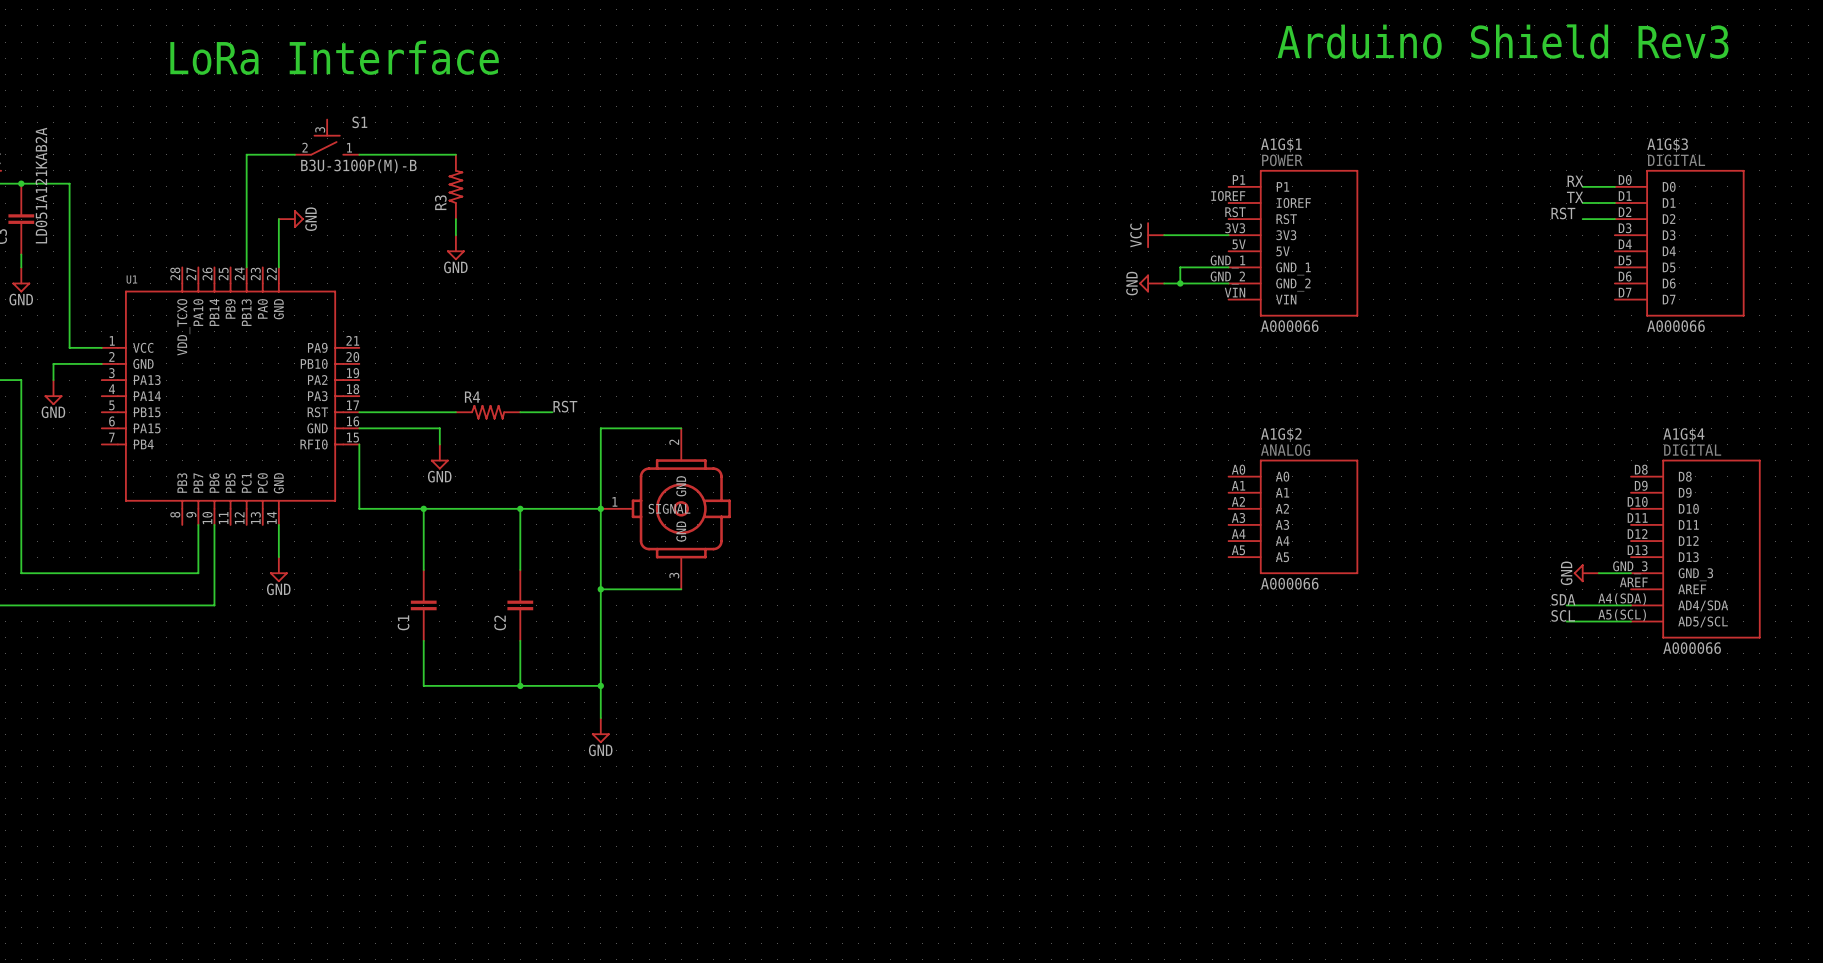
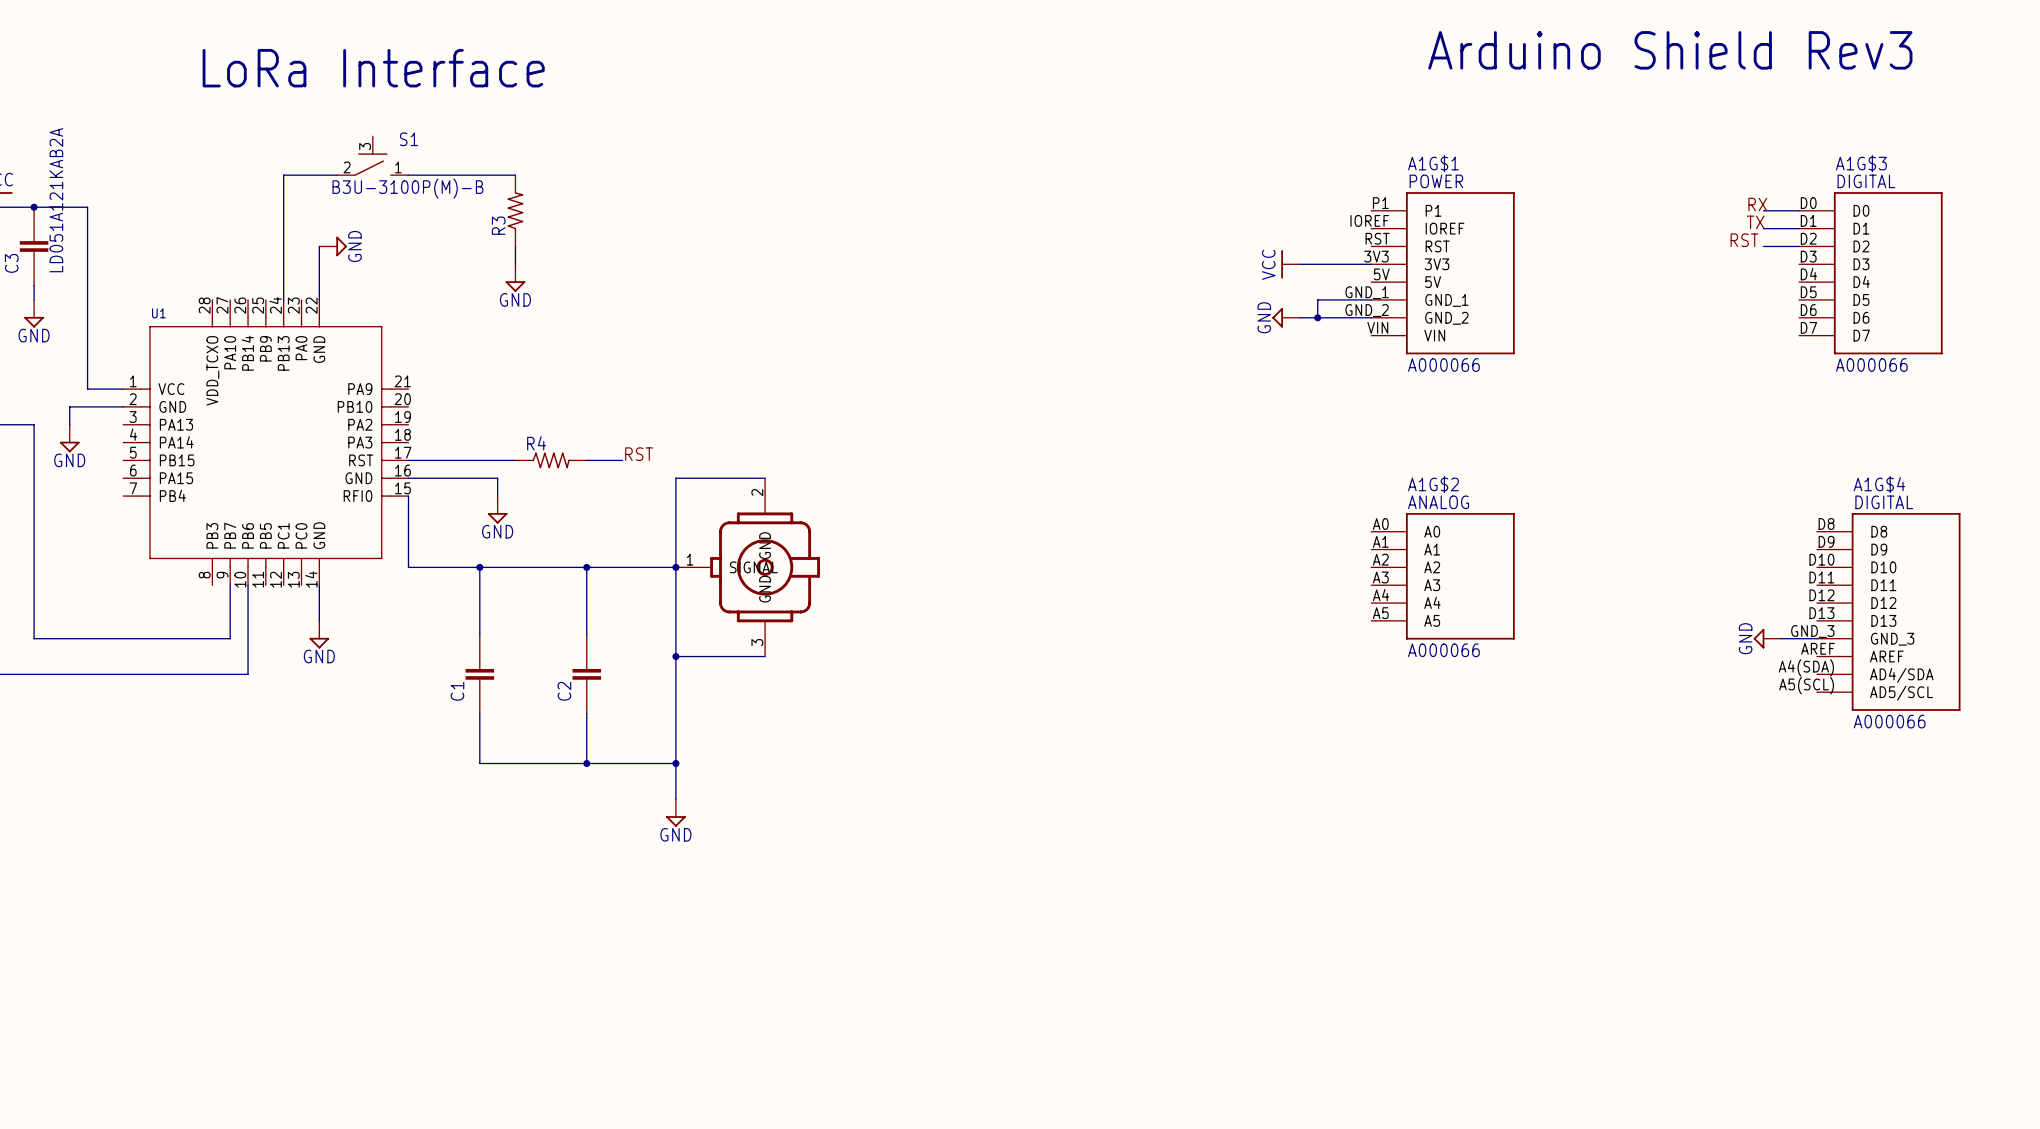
label: SDA (1563, 599) -> none
wire: (1566, 605) (1631, 605) -> none
label: SCL (1563, 615) -> none
wire: (1566, 621) (1631, 621) -> none

